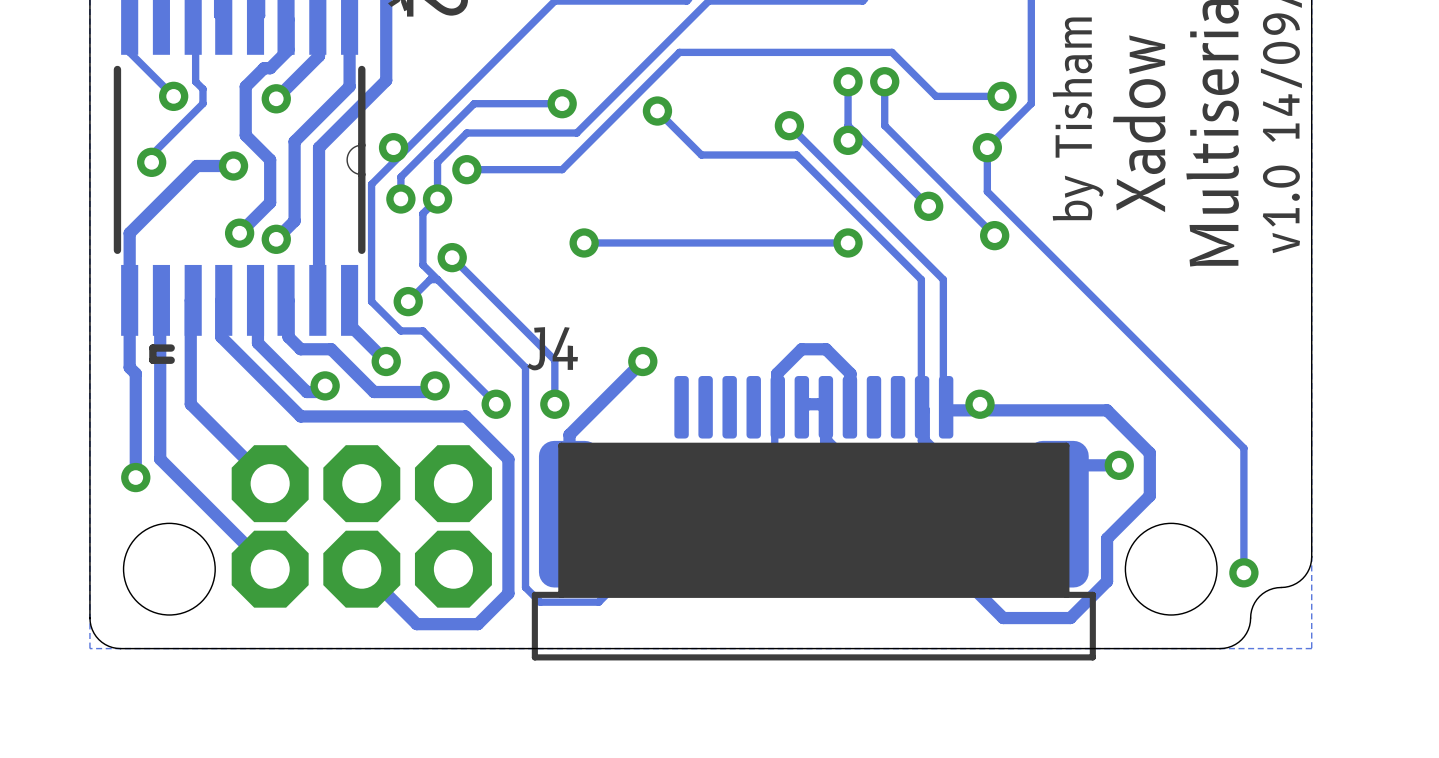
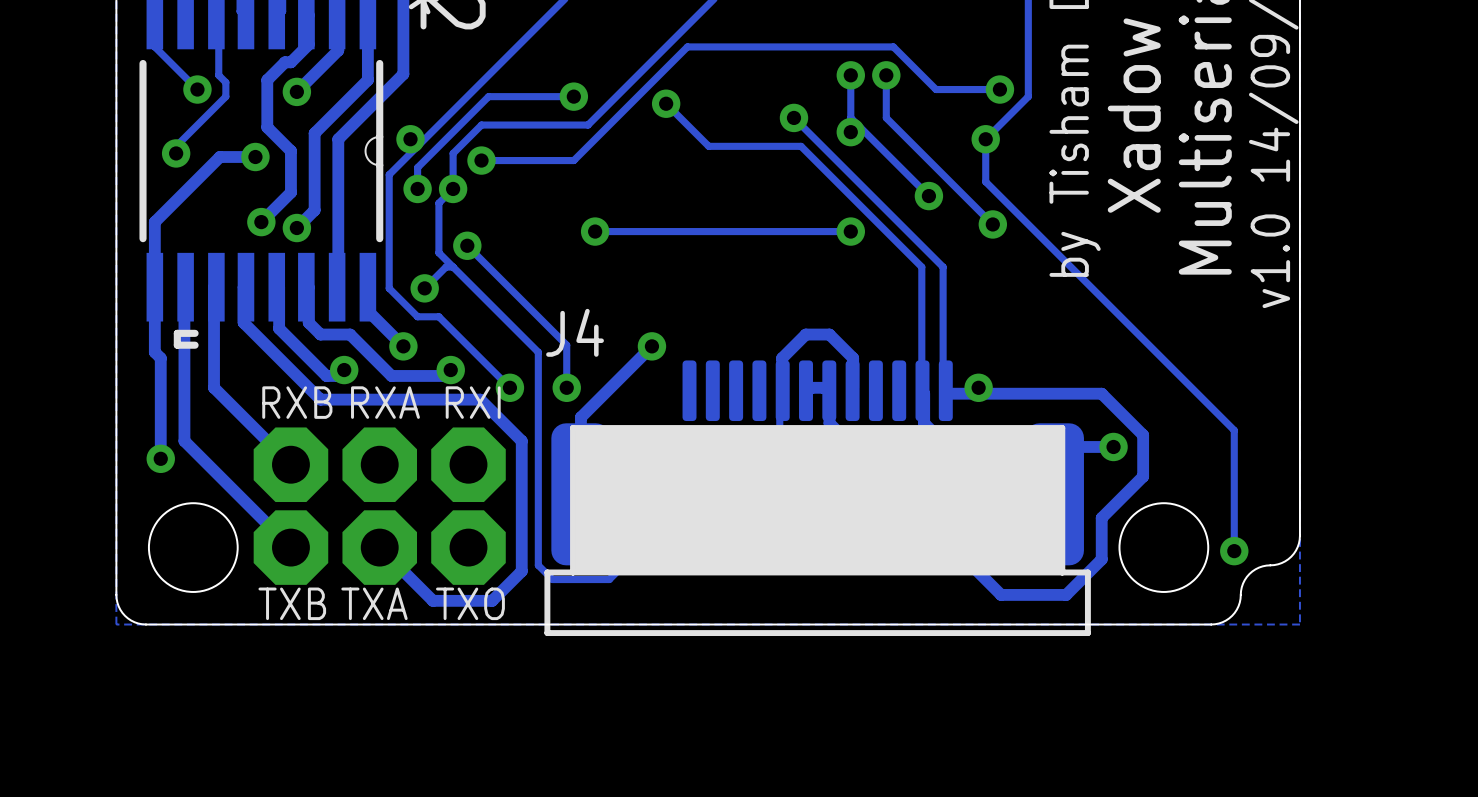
RXB name: none -> RXB (297, 402)
RXA name: none -> RXA (385, 402)
RXI name: none -> RXI (473, 402)
TXB name: none -> TXB (292, 603)
TXA name: none -> TXA (374, 603)
TXO name: none -> TXO (470, 603)

